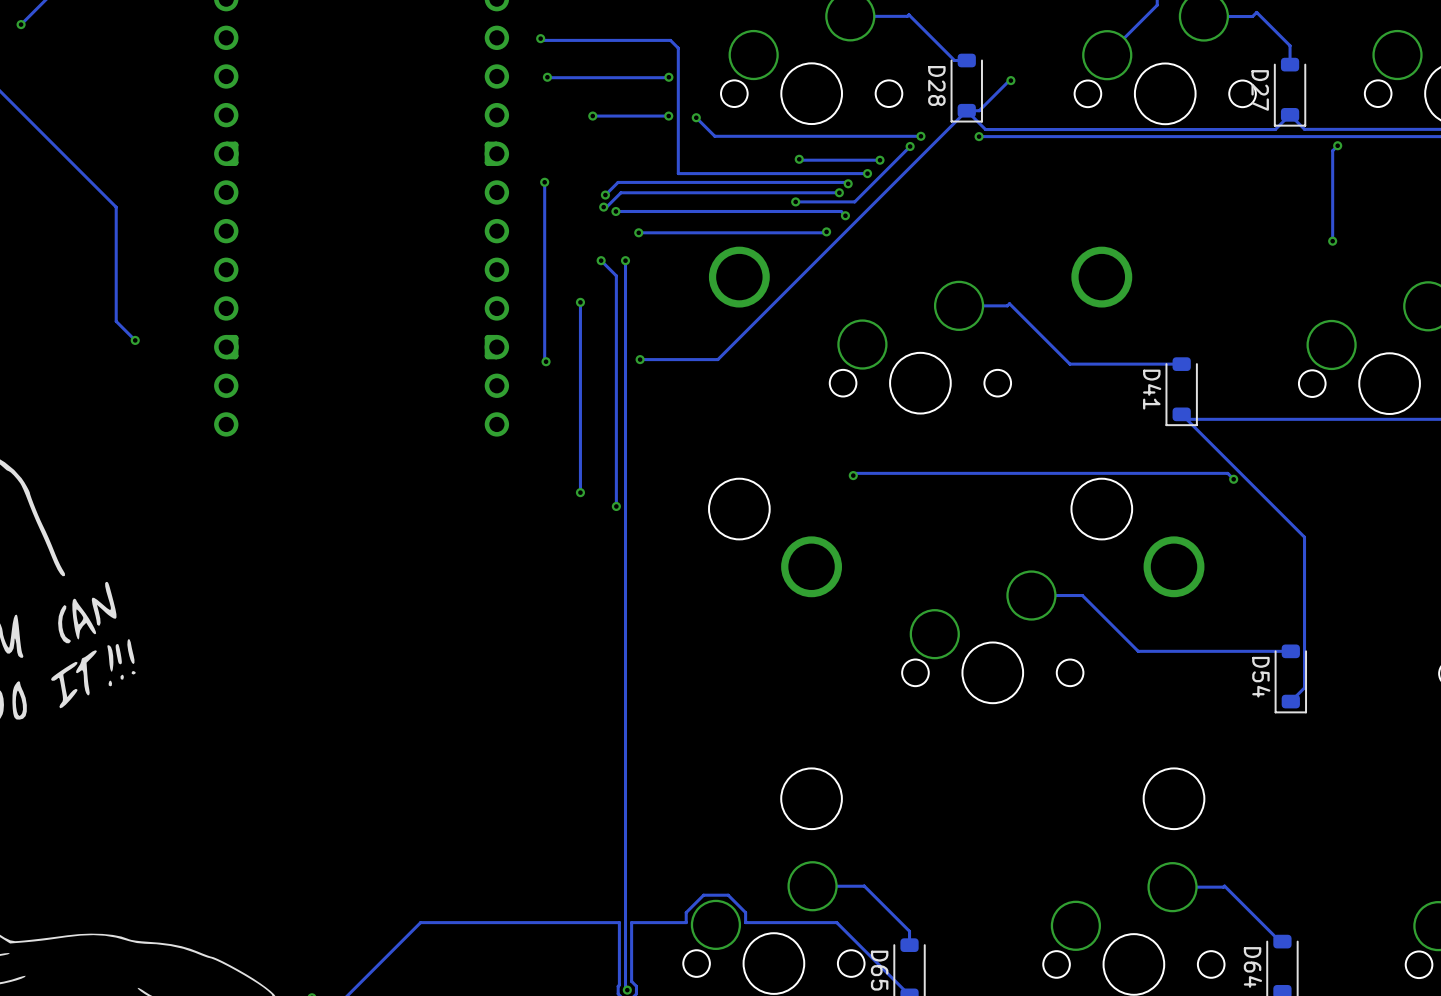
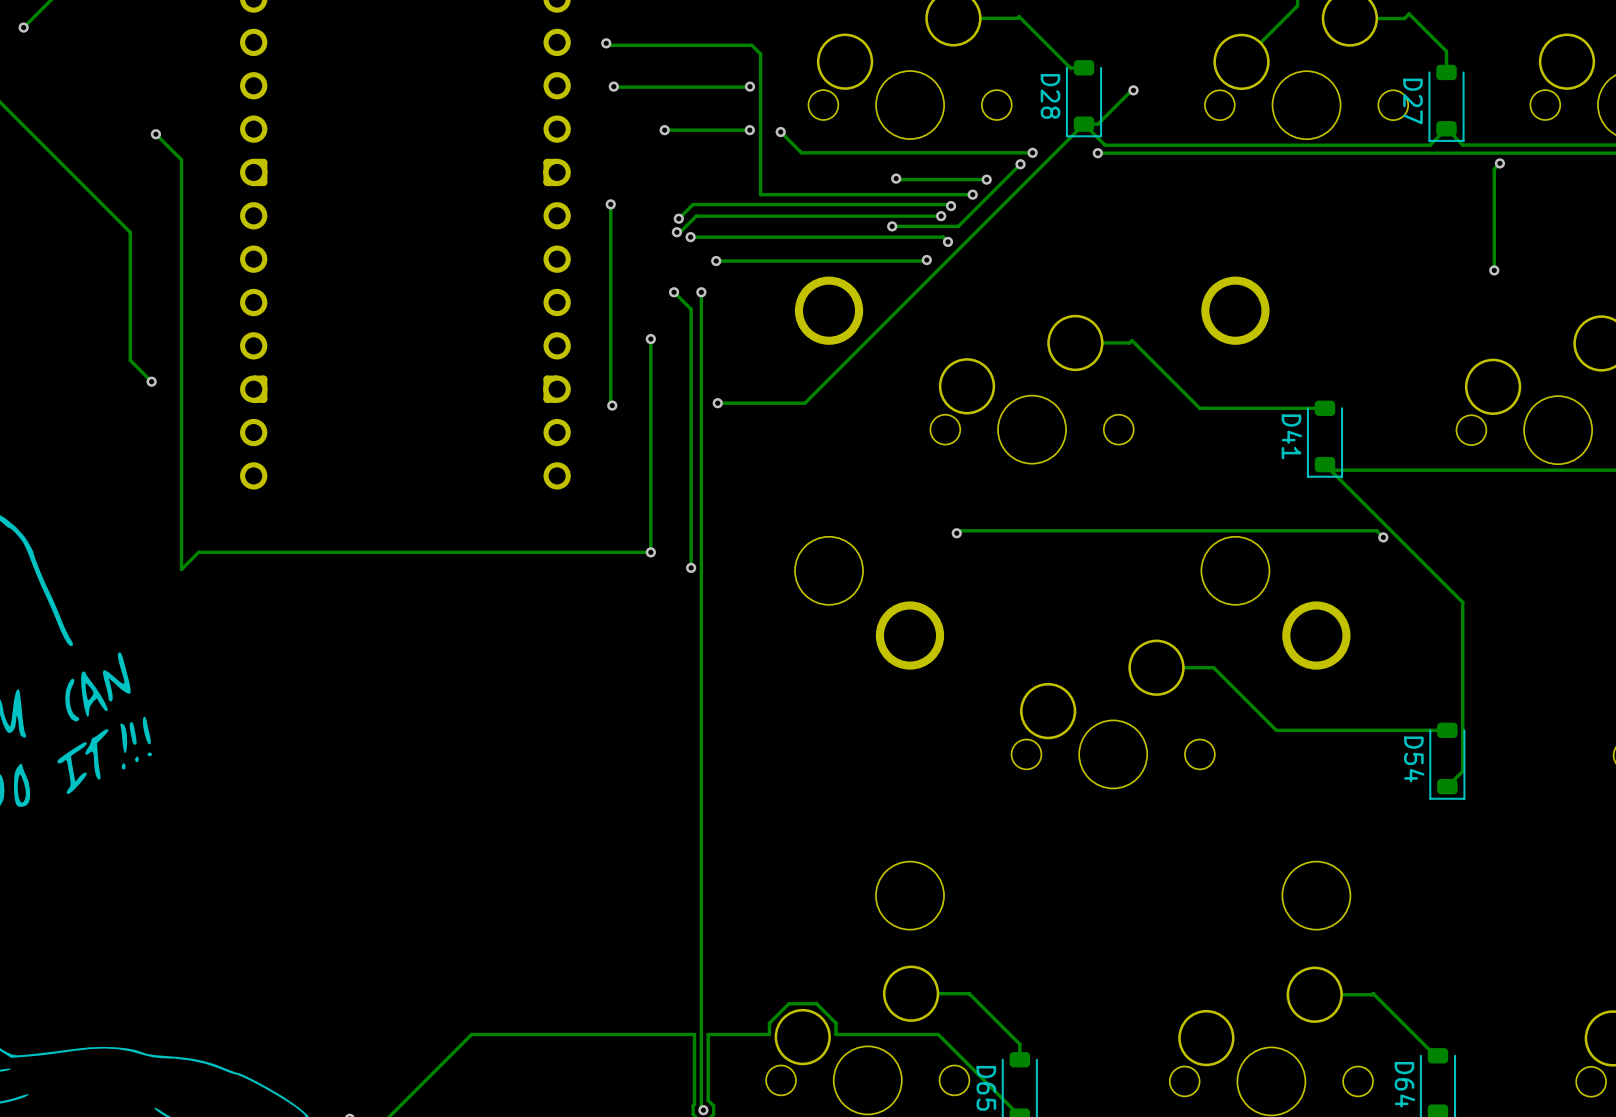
track: none -> (155, 134) (181, 159) (181, 569) (198, 552) (650, 552)
via: none -> (155, 134)

